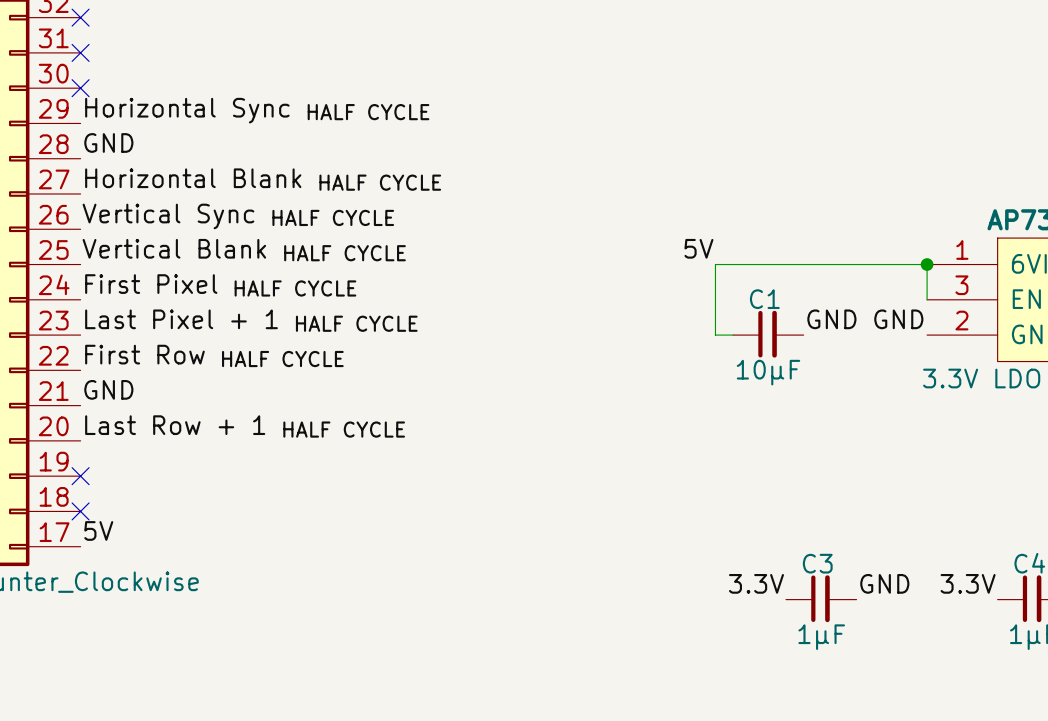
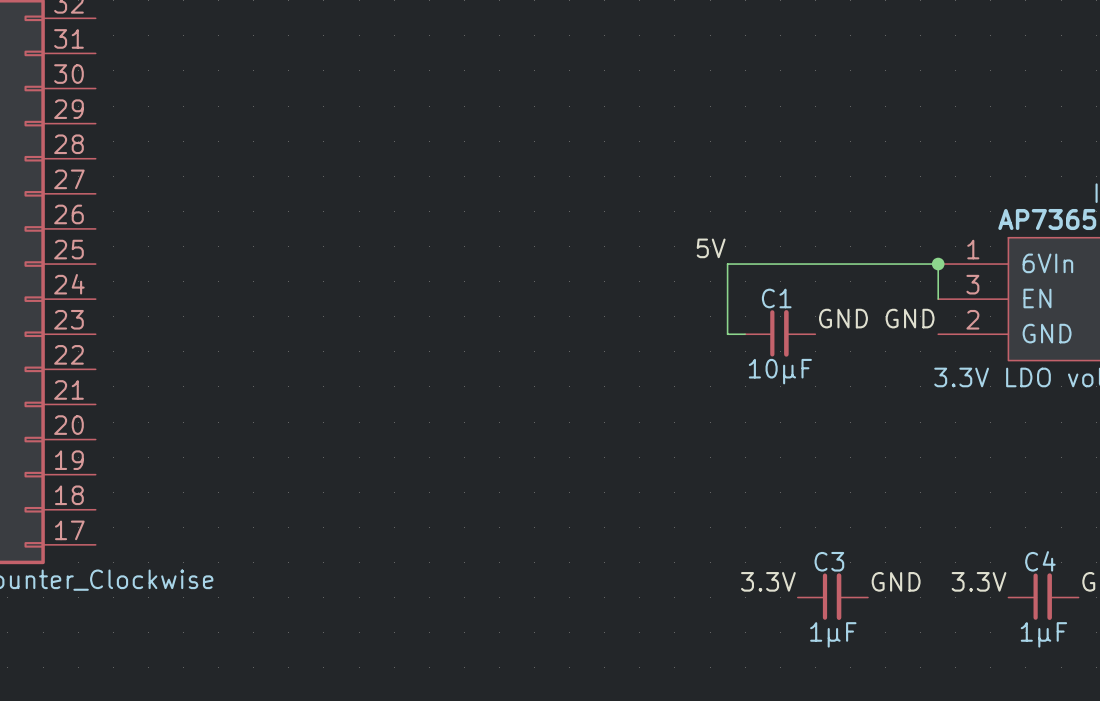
no-connect mark: (80, 17) -> none
no-connect mark: (80, 52) -> none
no-connect mark: (80, 88) -> none
label: Horizontal Sync HALF CYCLE (257, 110) -> none
label: GND (108, 142) -> none
label: Horizontal Blank HALF CYCLE (263, 179) -> none
label: Vertical Sync HALF CYCLE (238, 216) -> none
label: Vertical Blank HALF CYCLE (244, 250) -> none
label: First Pixel HALF CYCLE (220, 285) -> none
label: Last Pixel + 1 HALF CYCLE (251, 320) -> none
label: First Row HALF CYCLE (214, 355) -> none
label: GND (108, 389) -> none
label: Last Row + 1 HALF CYCLE (245, 426) -> none
no-connect mark: (80, 476) -> none
no-connect mark: (80, 511) -> none
label: 5V (98, 530) -> none

